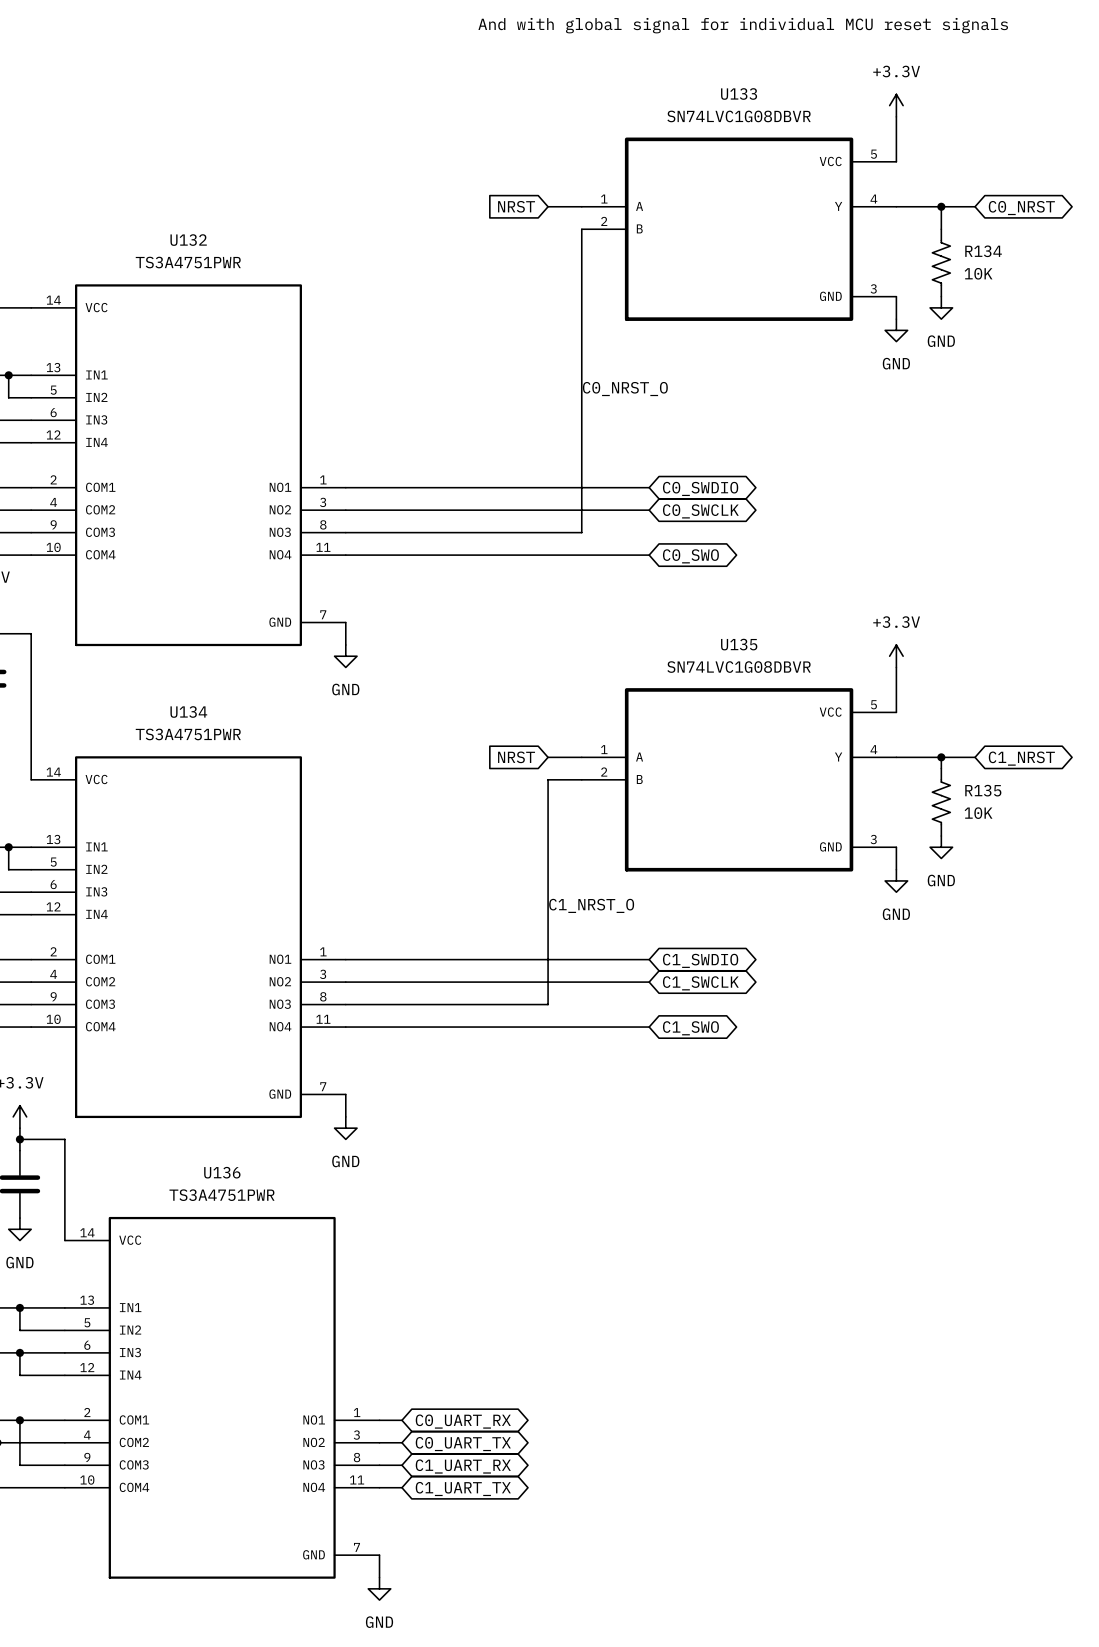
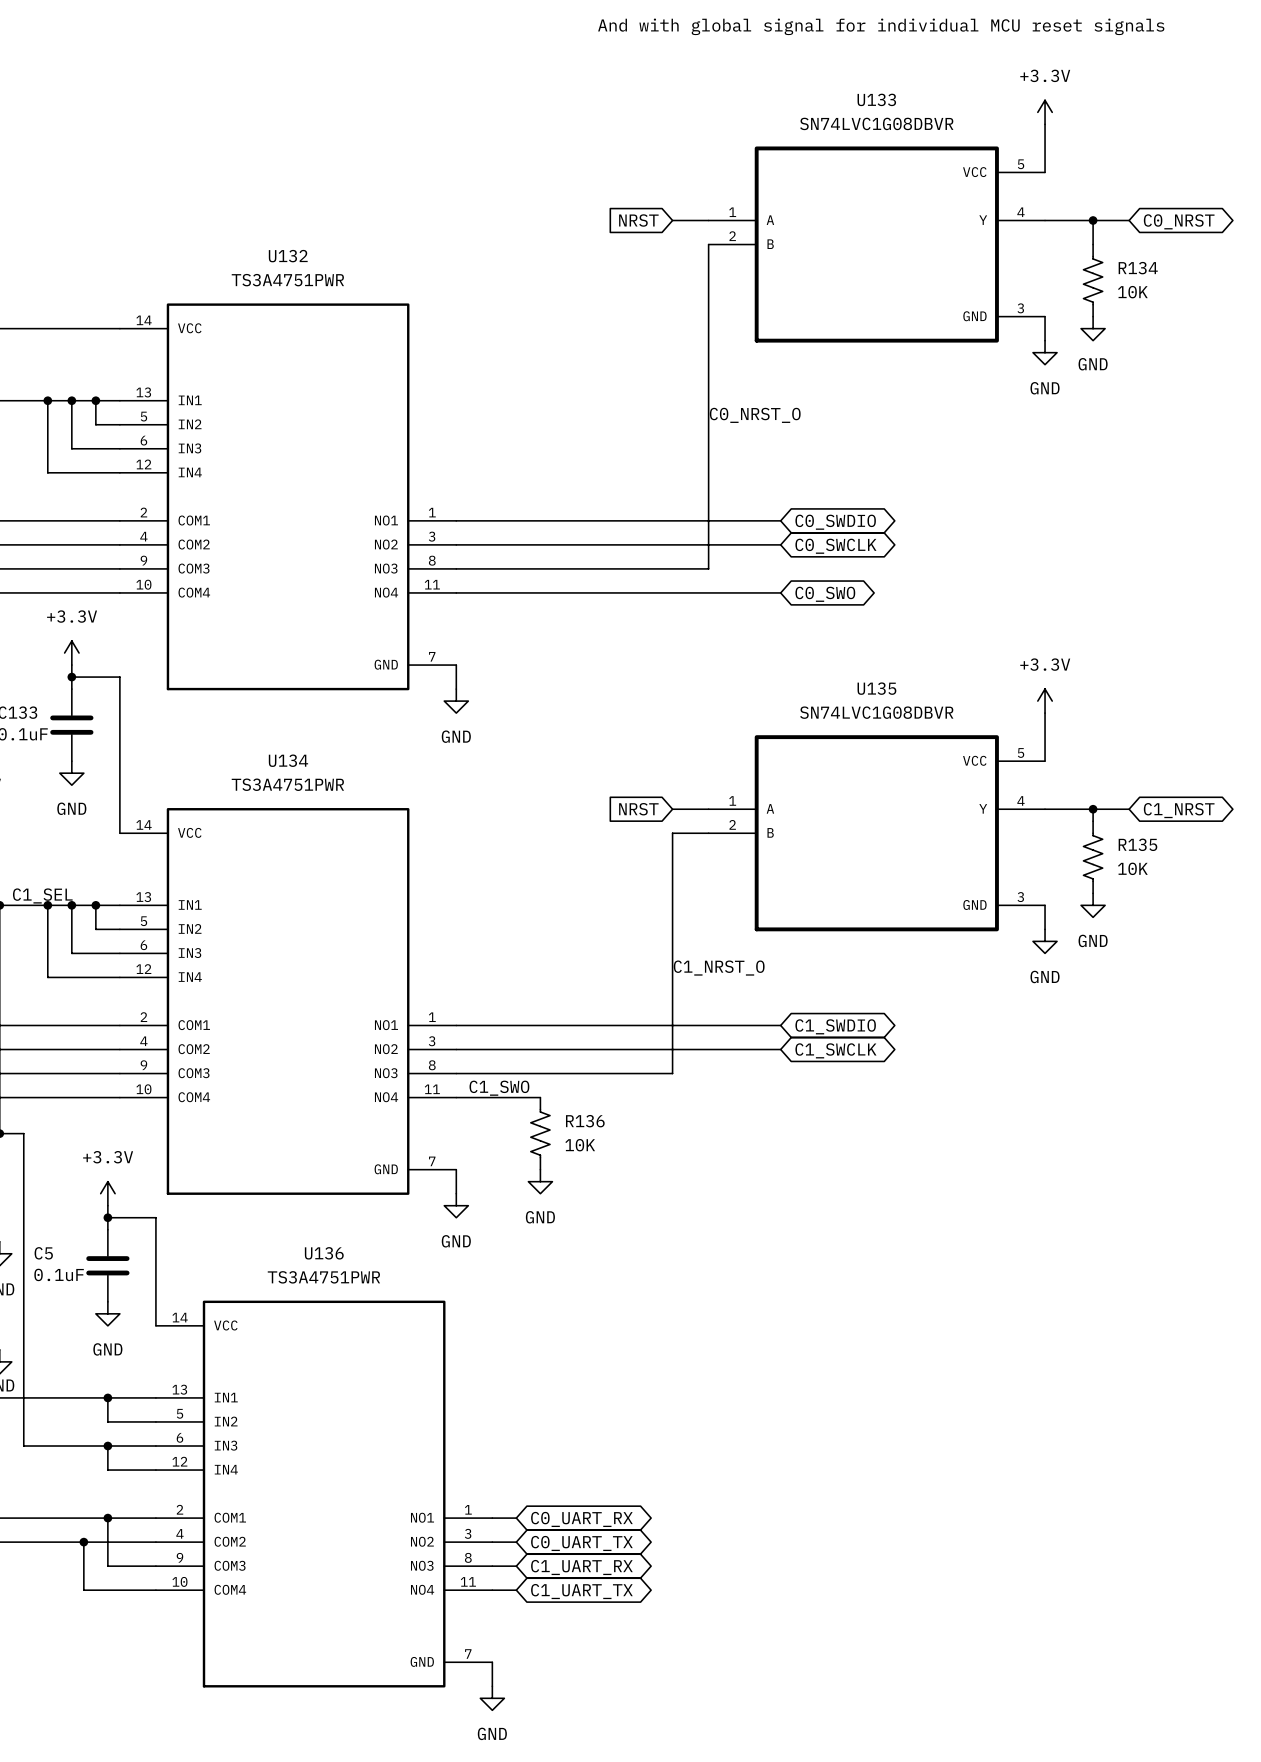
label: none -> C1_SWO (499, 1088)
wire: (424, 1027) (649, 1027) -> none
global label: C1_SWO (690, 1028) -> none
R136: none -> 10K (540, 1133)
power symbol: none -> GND (540, 1181)

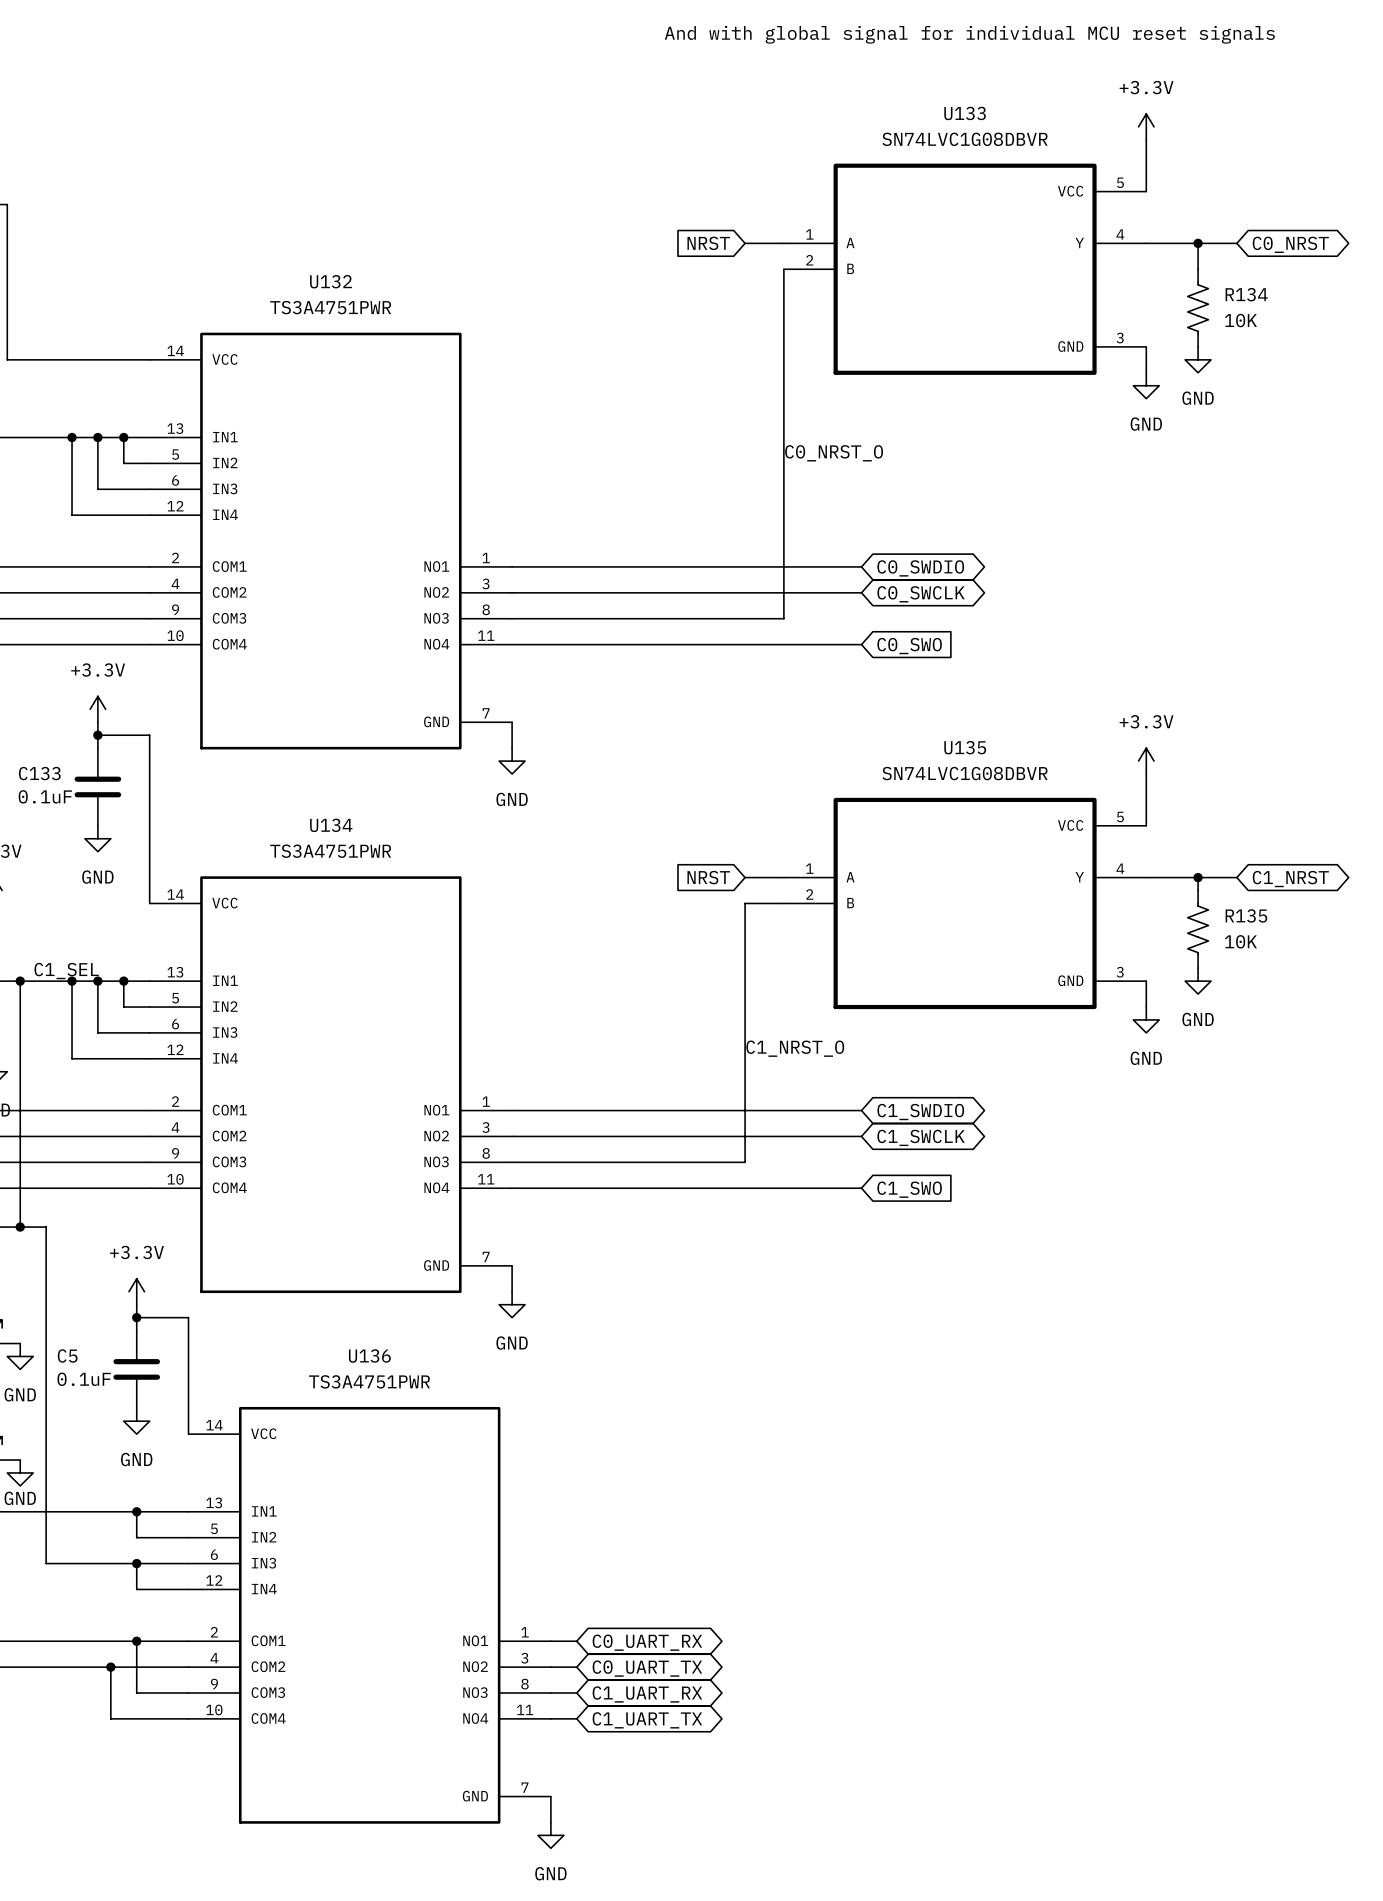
global label shape: bidirectional (825, 594) -> input (909, 646)
label: C1_SWO (499, 1088) -> none
wire: none -> (602, 1188) (861, 1188)
global label: none -> C1_SWO (909, 1189)
R136: 10K (540, 1133) -> none
power symbol: GND (540, 1181) -> none

